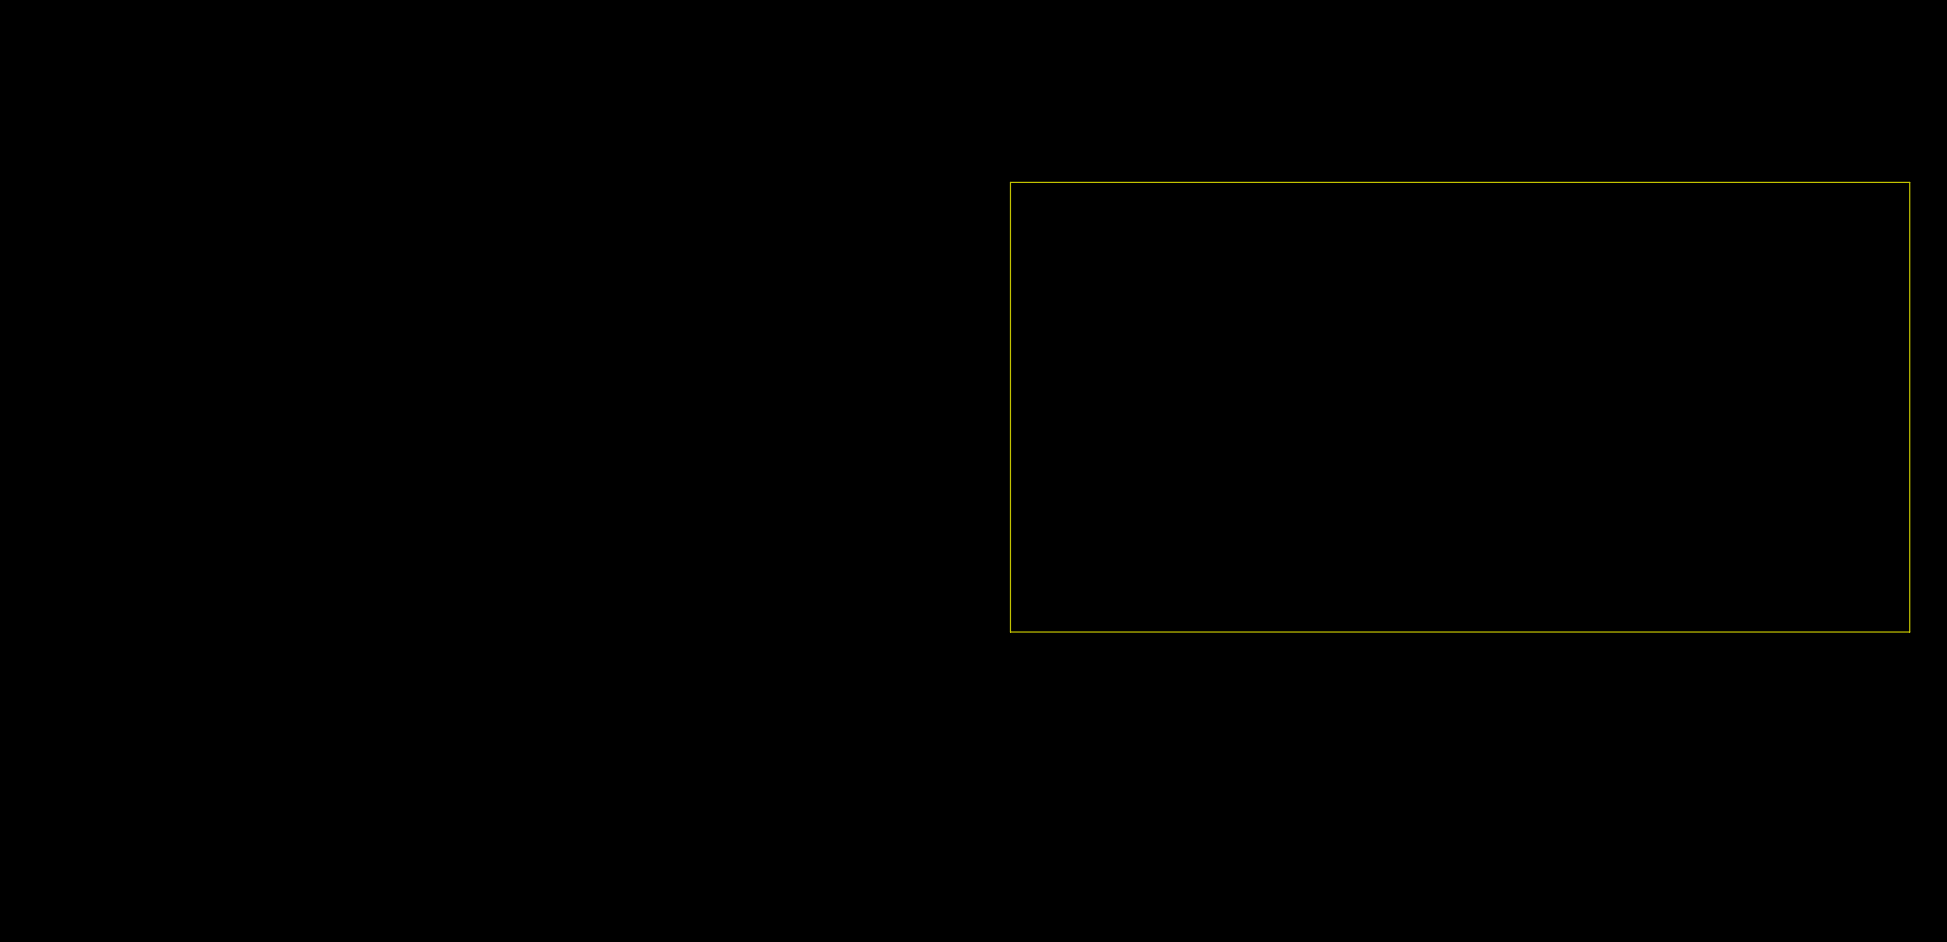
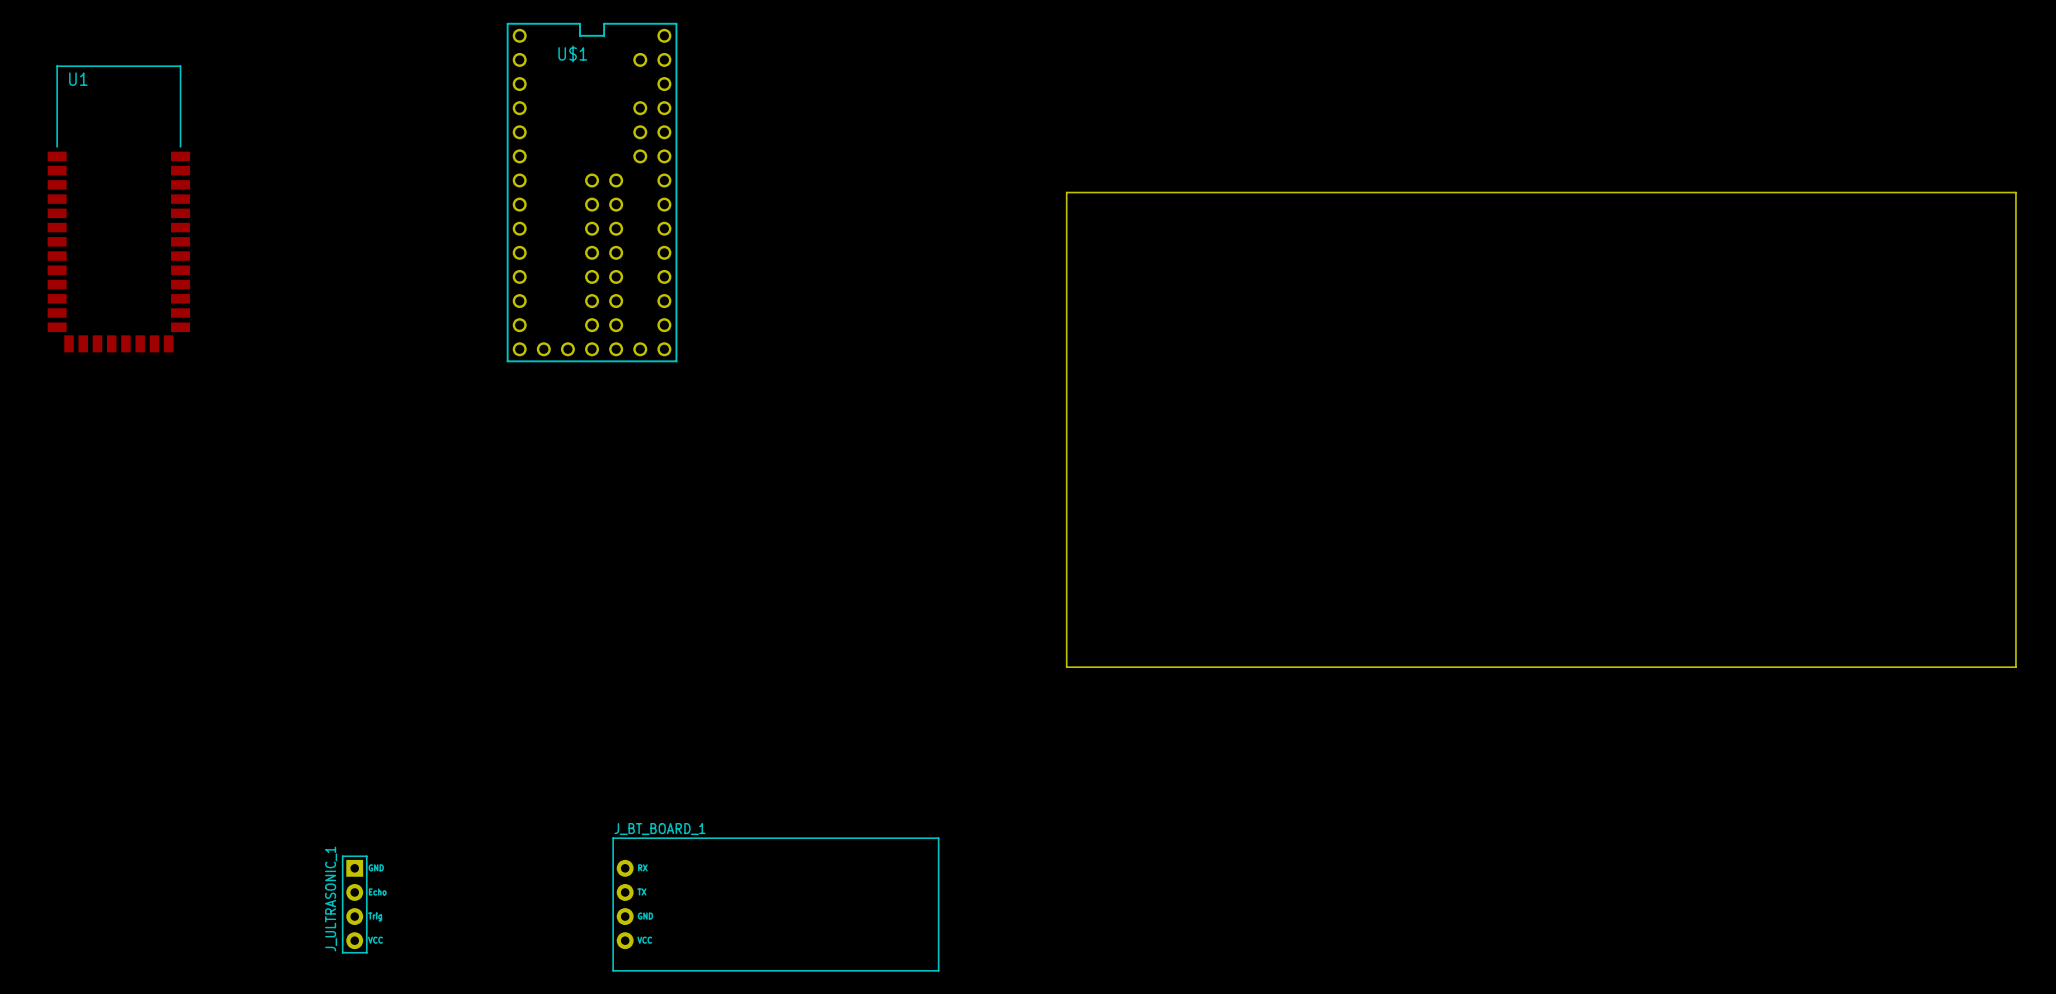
U$1: none -> (592, 192)
U1: none -> (118, 209)
J_ULTRASONIC_1: none -> (354, 904)
J_BT_BOARD_1: none -> (775, 904)

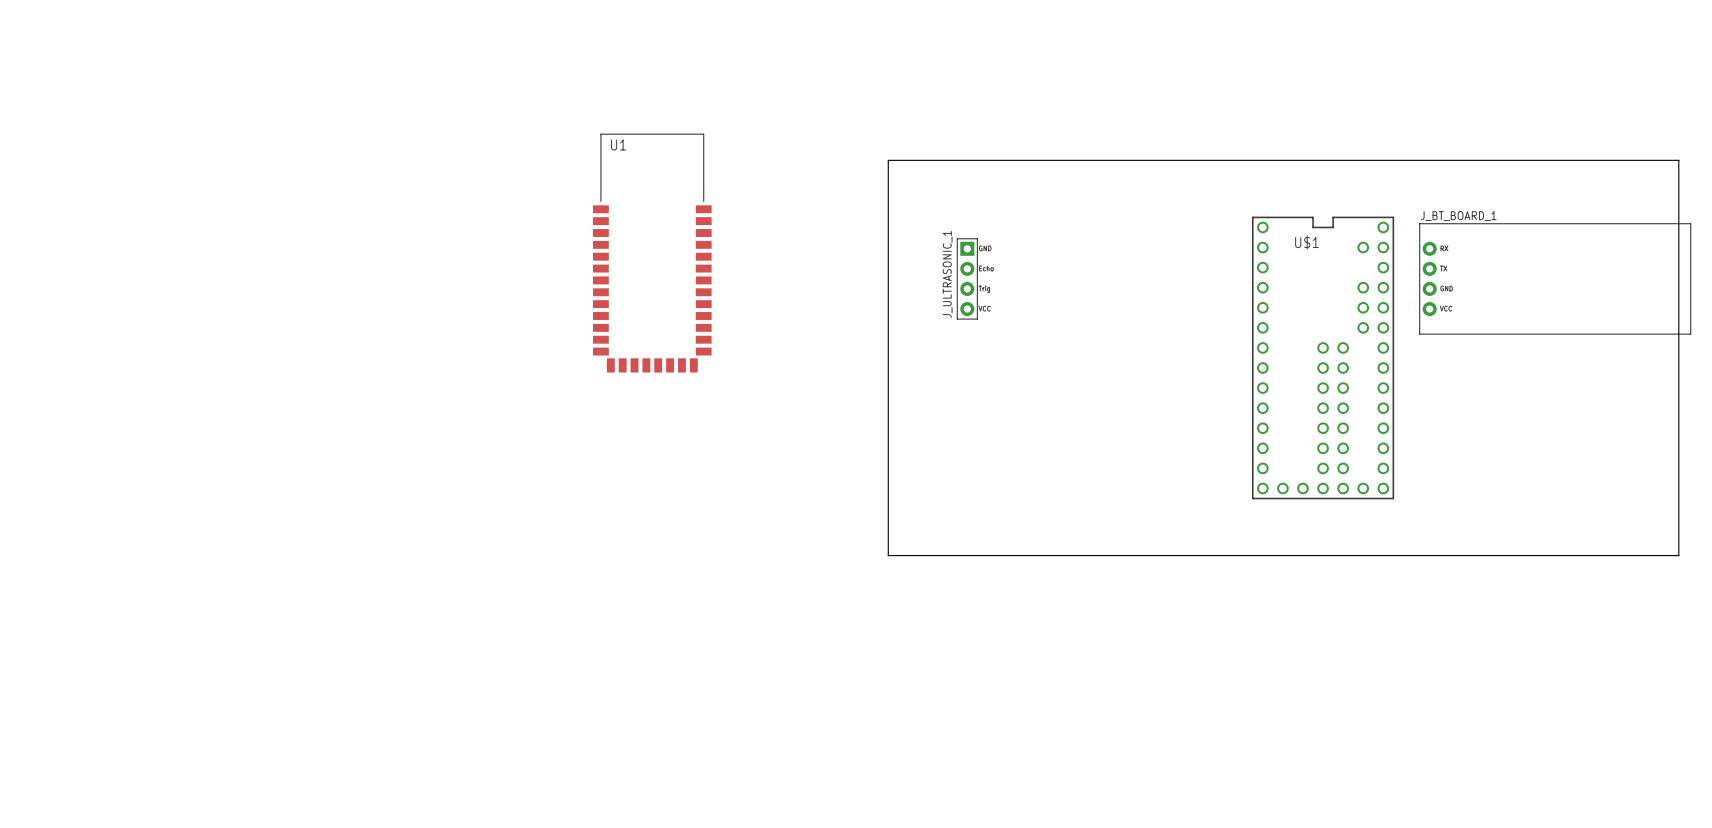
U$1 position: (592, 192) -> (1323, 357)
U1 position: (118, 209) -> (652, 253)
J_ULTRASONIC_1 position: (354, 904) -> (967, 278)
J_BT_BOARD_1 position: (775, 904) -> (1555, 278)

